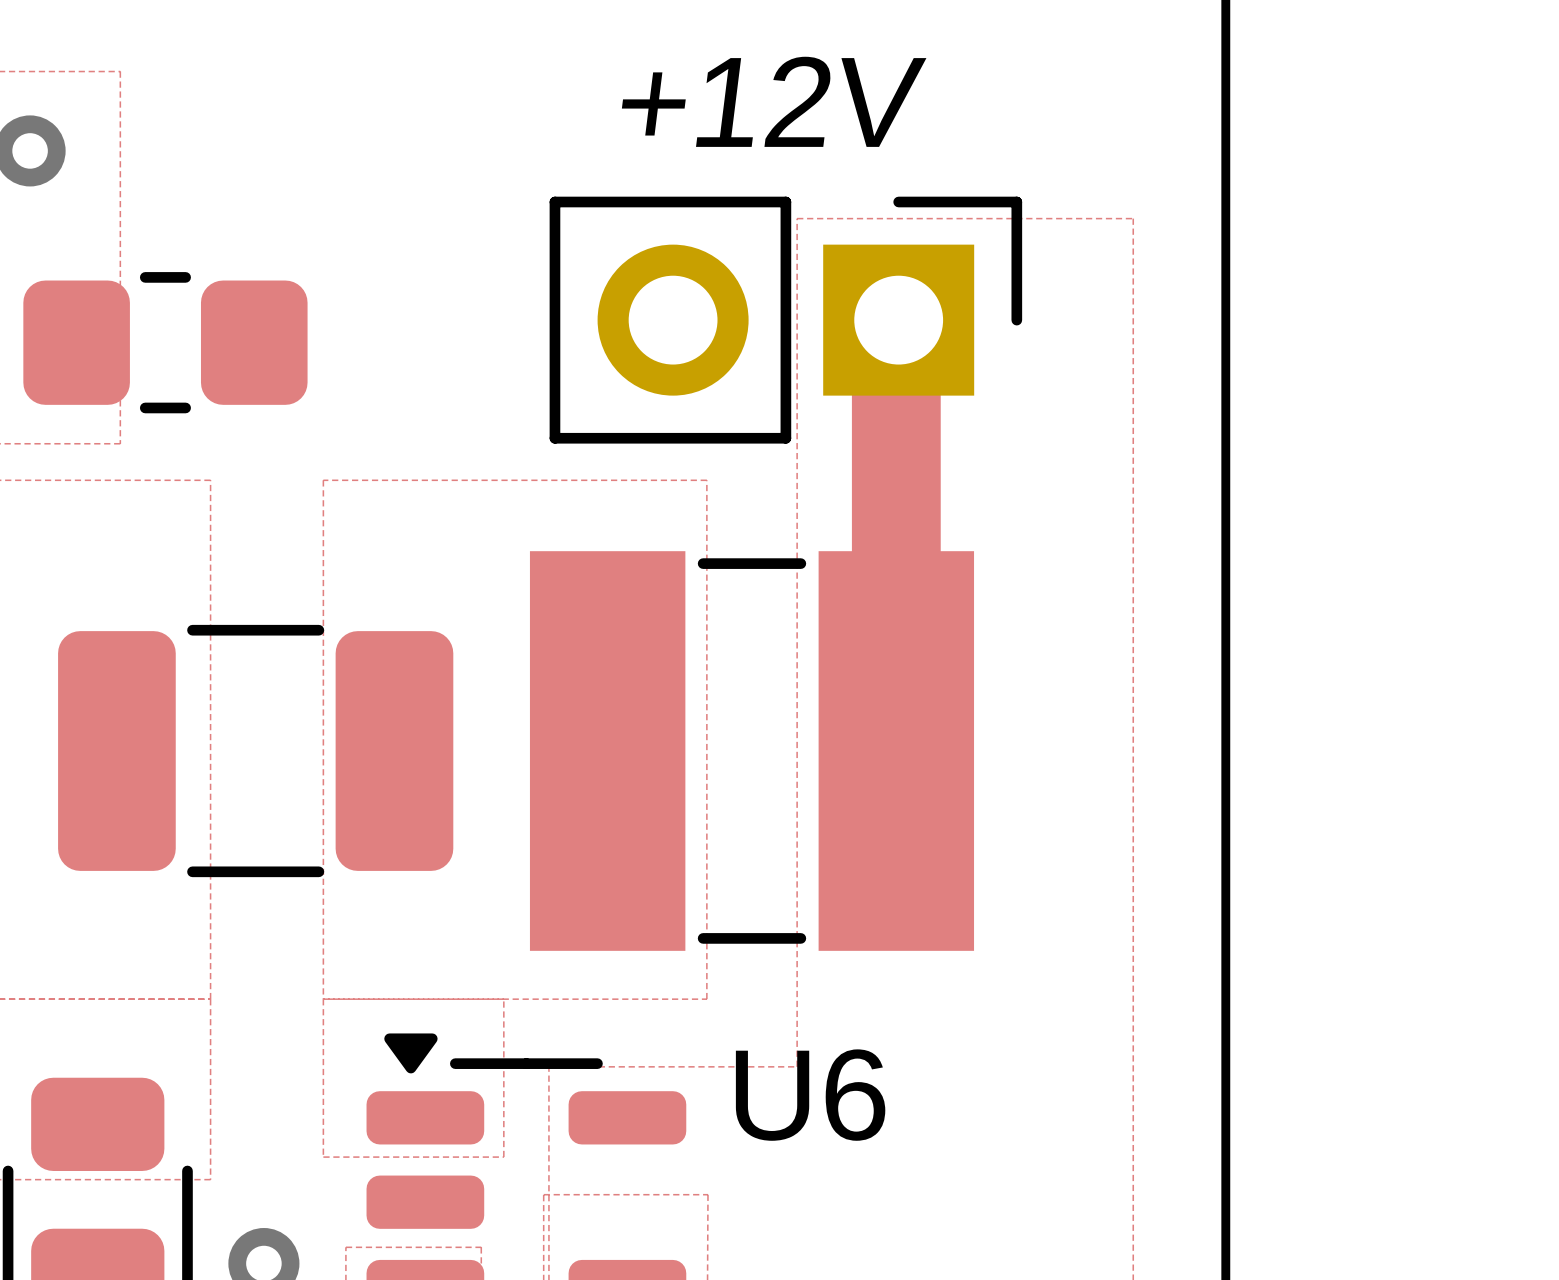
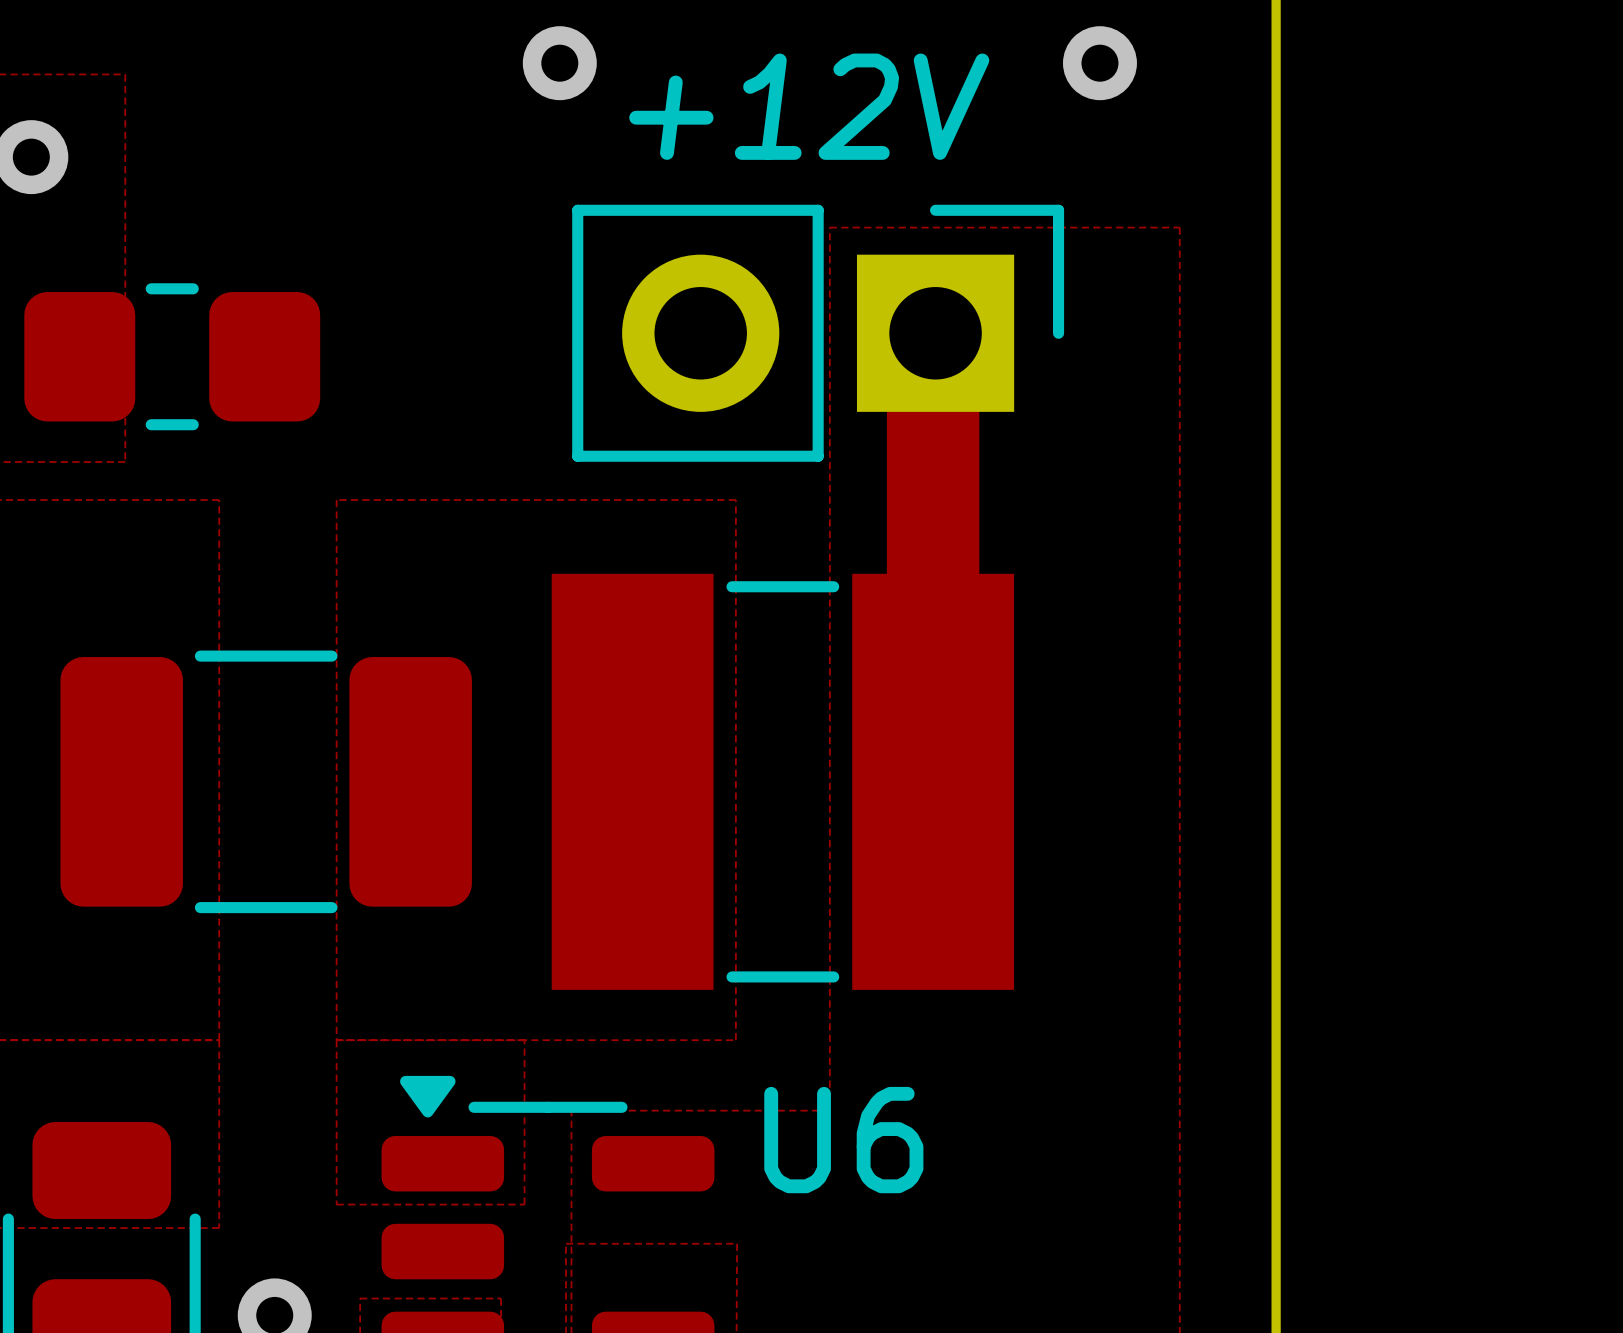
via: none -> (559, 63)
via: none -> (1099, 63)

